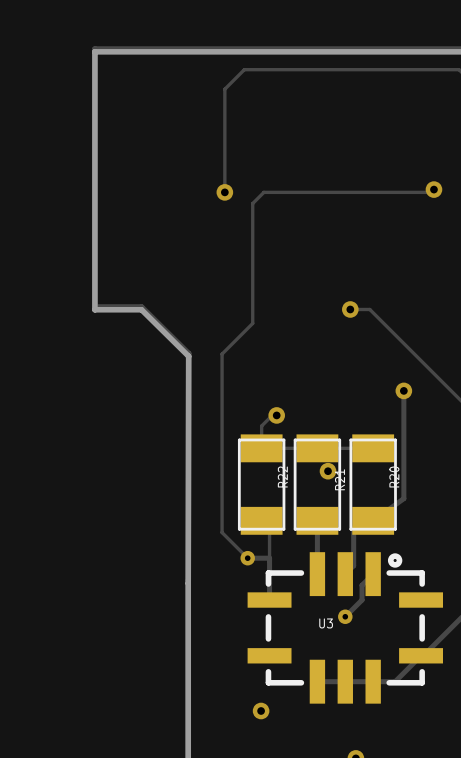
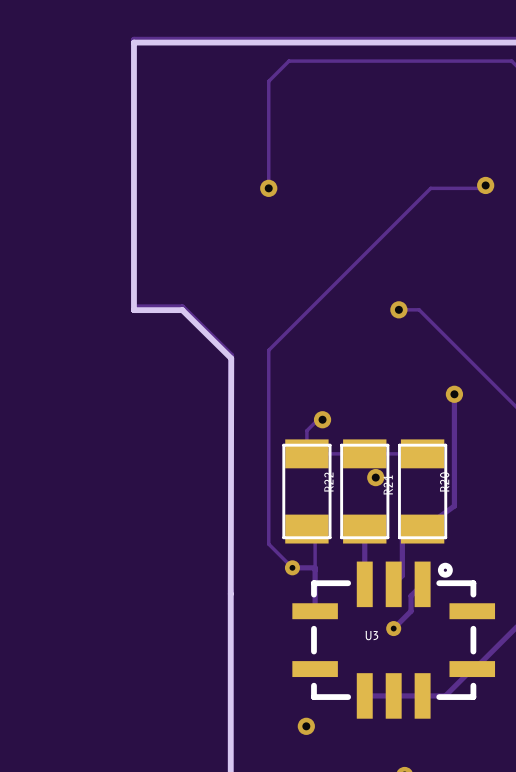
track: (380, 192) (263, 192) (252, 203) (252, 323) (222, 354) (222, 532) (224, 535) -> (430, 188) (268, 350) (268, 544)

